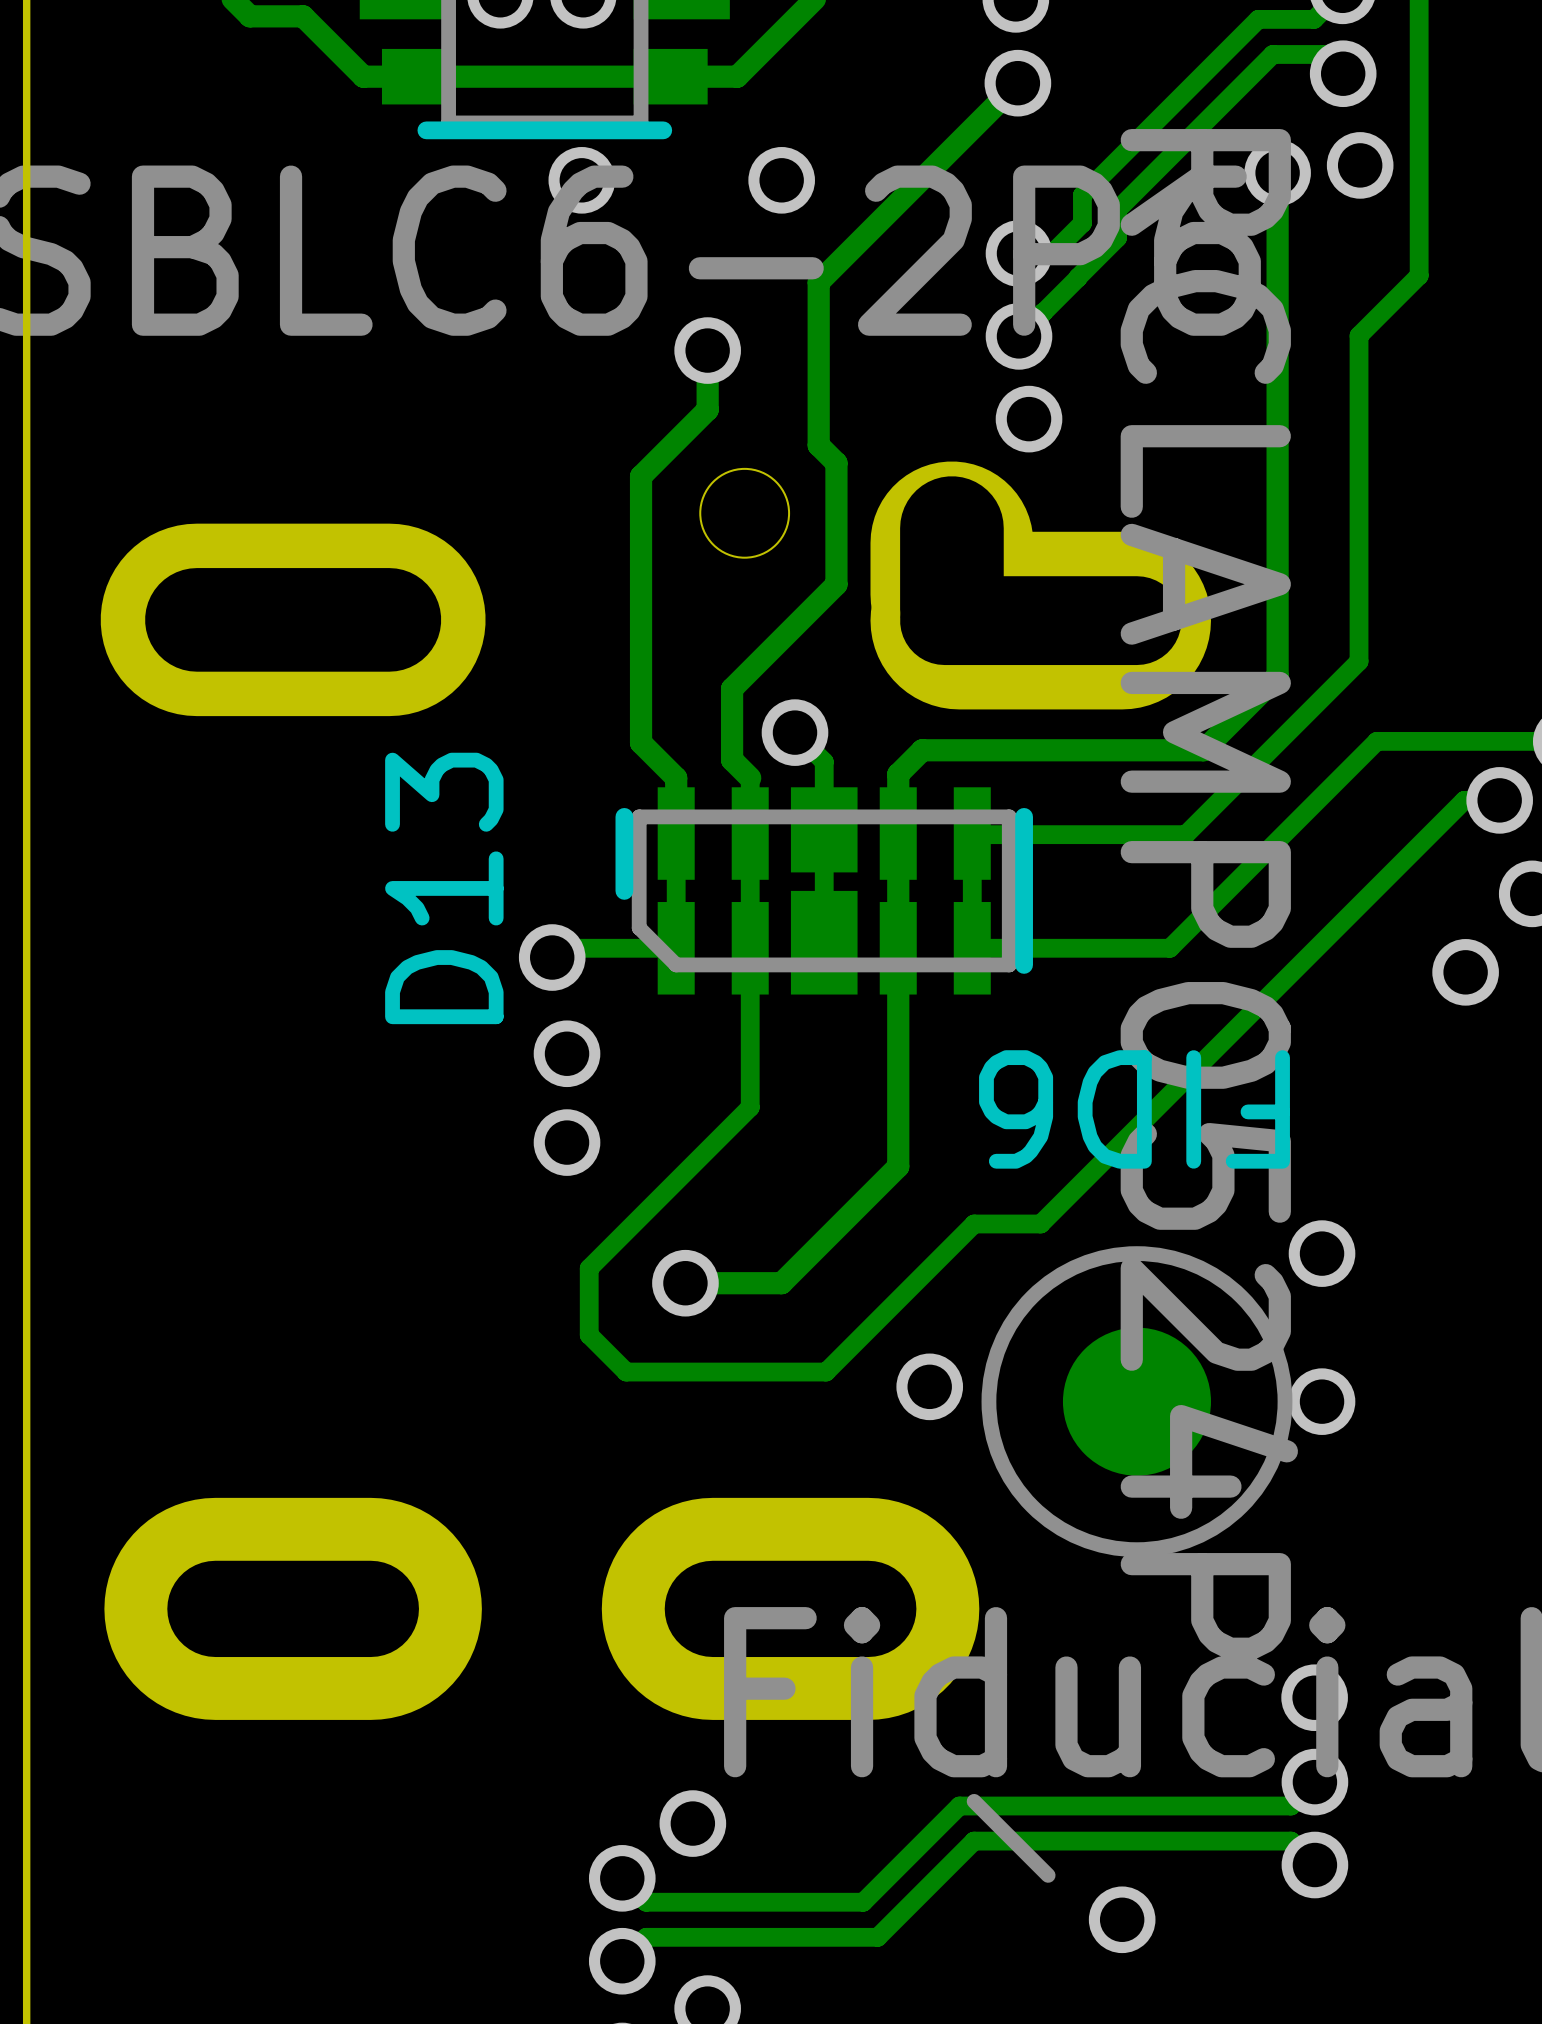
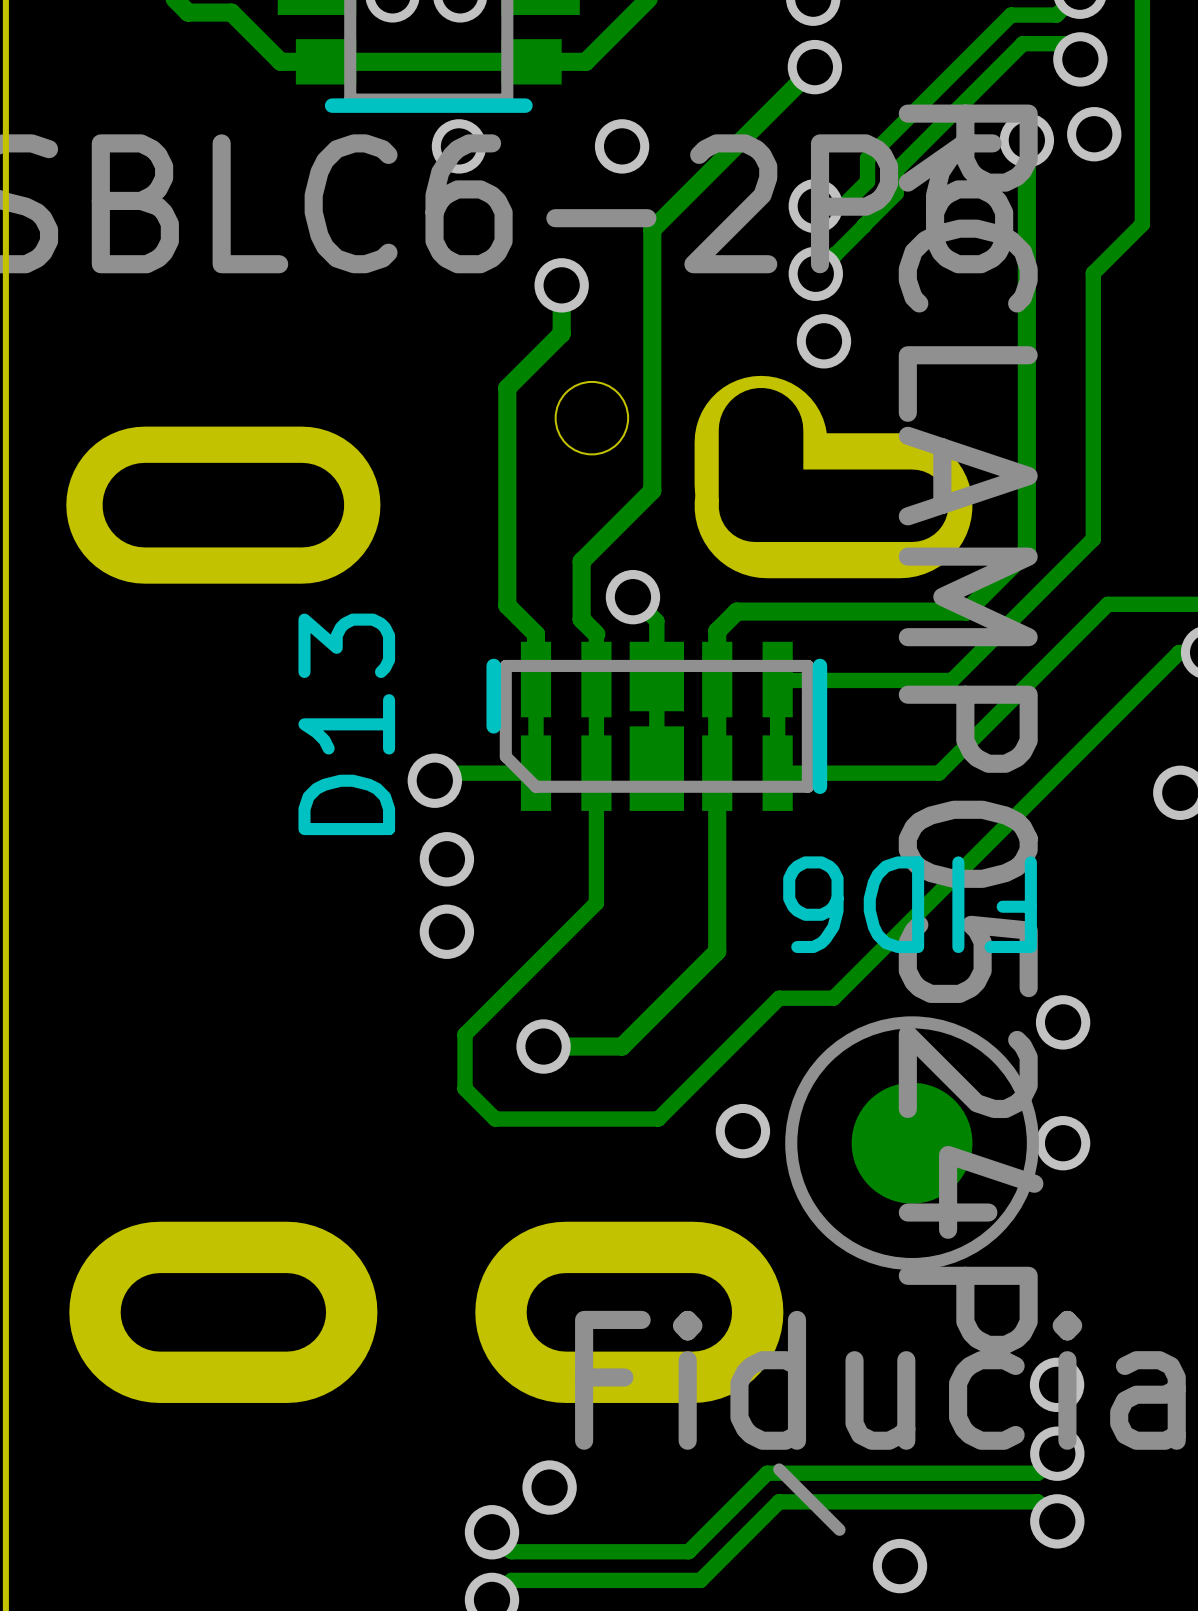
track: (818, 445) (836, 463) (836, 584) (818, 602) -> (652, 362) (652, 490)

